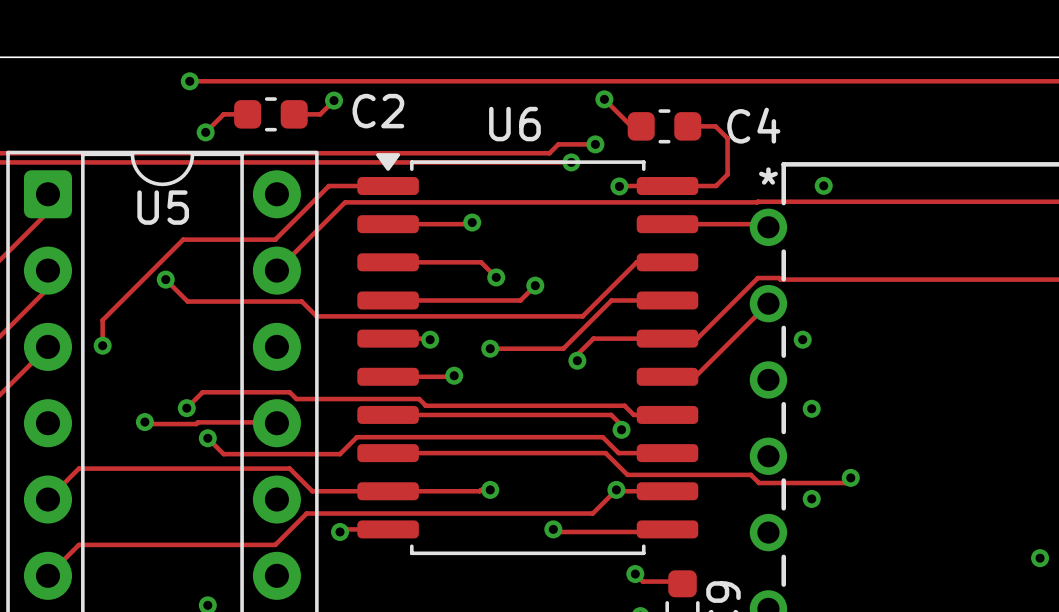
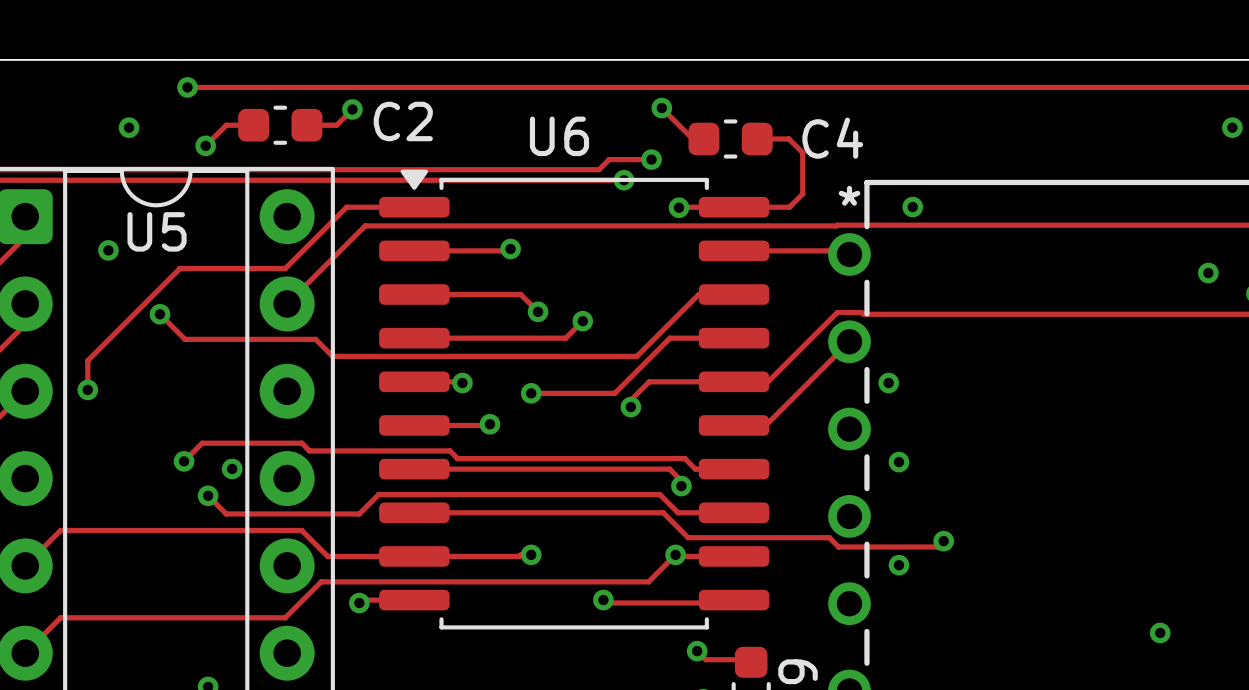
via: none -> (129, 127)
via: none -> (108, 250)
track: (144, 422) (146, 424) (276, 423) -> none
via position: (144, 422) -> (232, 468)

